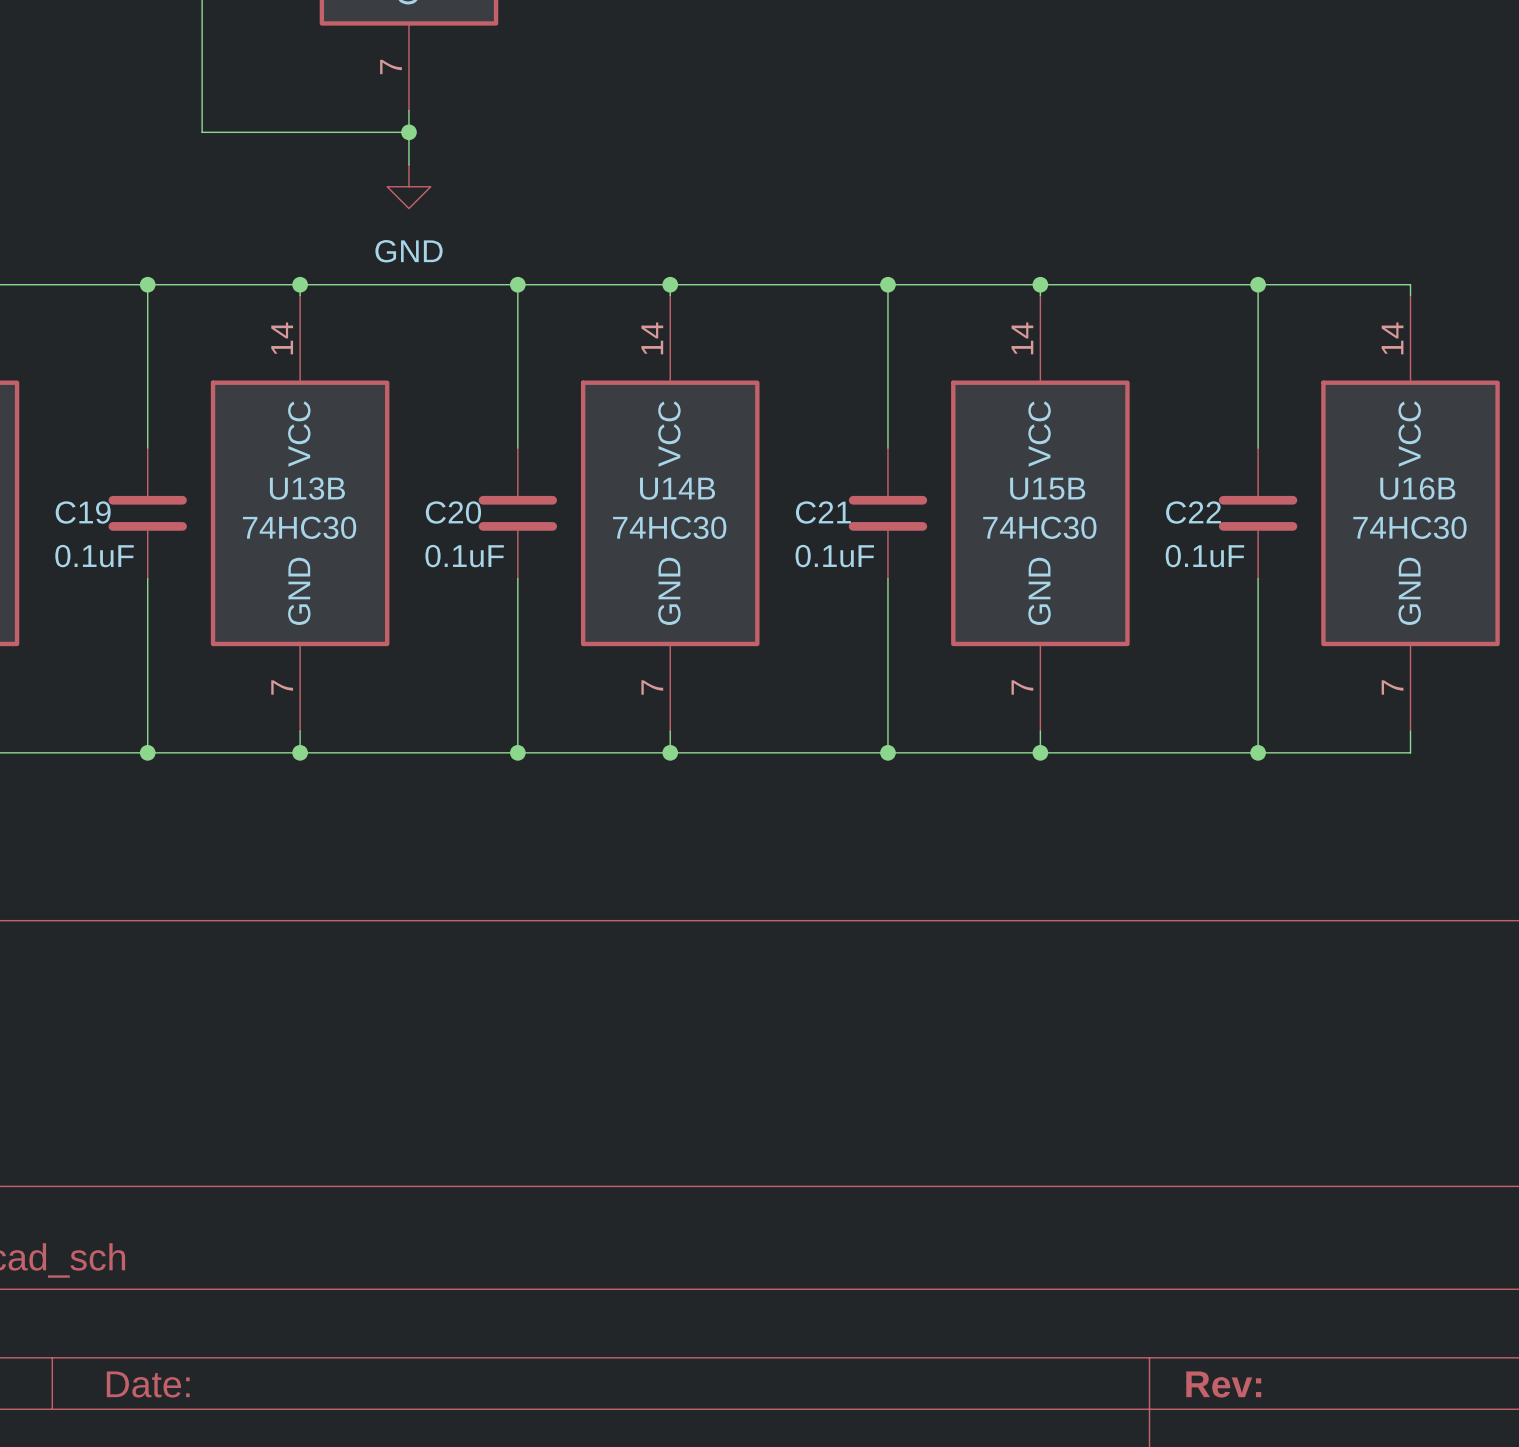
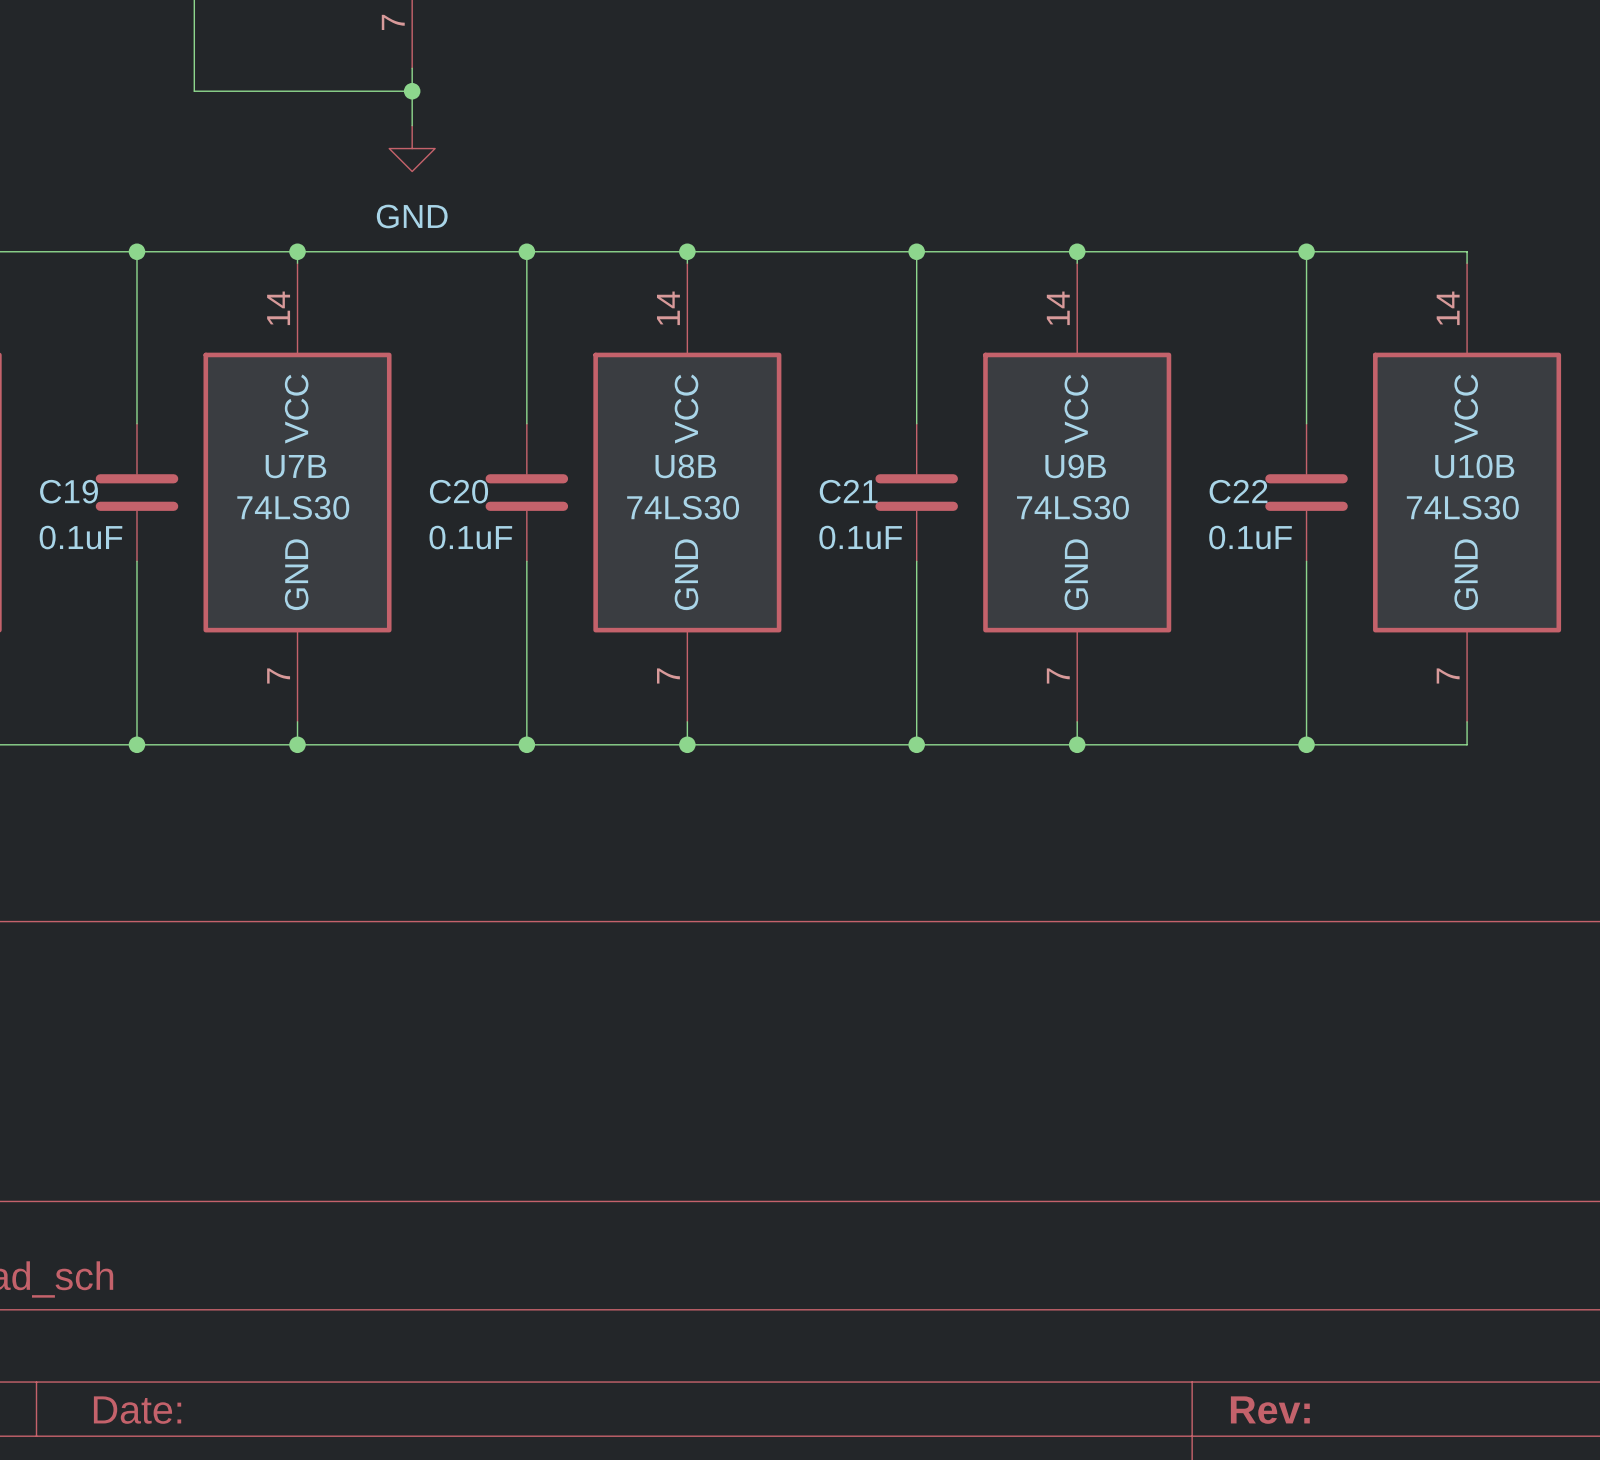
U13B name: U13B (307, 488) -> U7B (295, 466)
U14B name: U14B (677, 488) -> U8B (685, 466)
U15B name: U15B (1047, 488) -> U9B (1075, 466)
U16B name: U16B (1417, 488) -> U10B (1474, 466)
U13B value: 74HC30 (299, 527) -> 74LS30 (293, 507)
U14B value: 74HC30 (669, 527) -> 74LS30 (683, 507)
U15B value: 74HC30 (1039, 527) -> 74LS30 (1072, 507)
U16B value: 74HC30 (1409, 527) -> 74LS30 (1462, 507)

